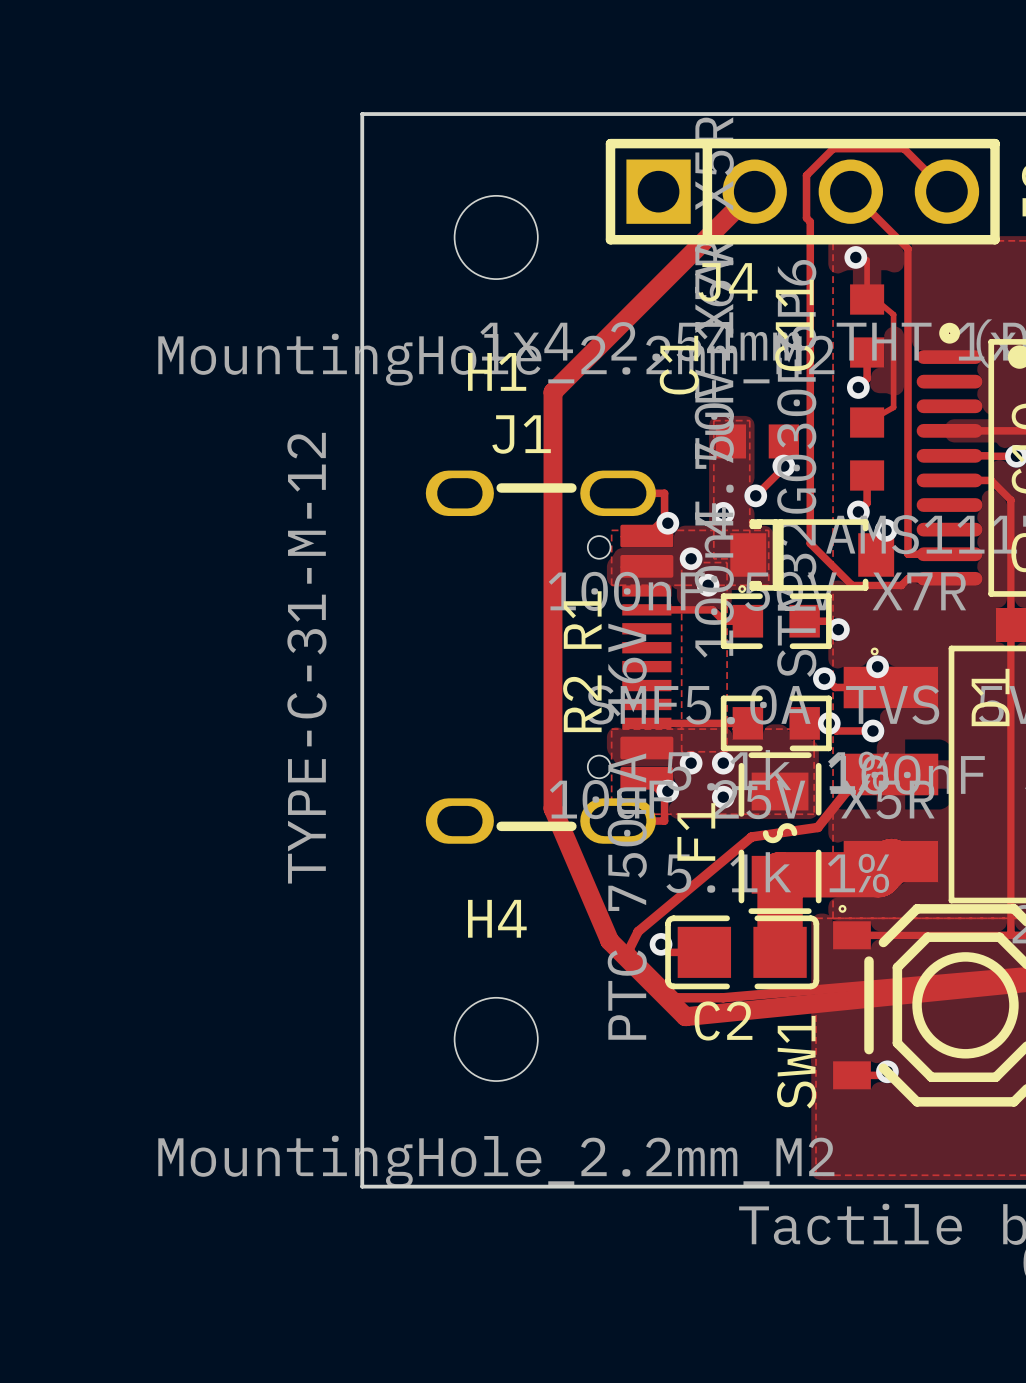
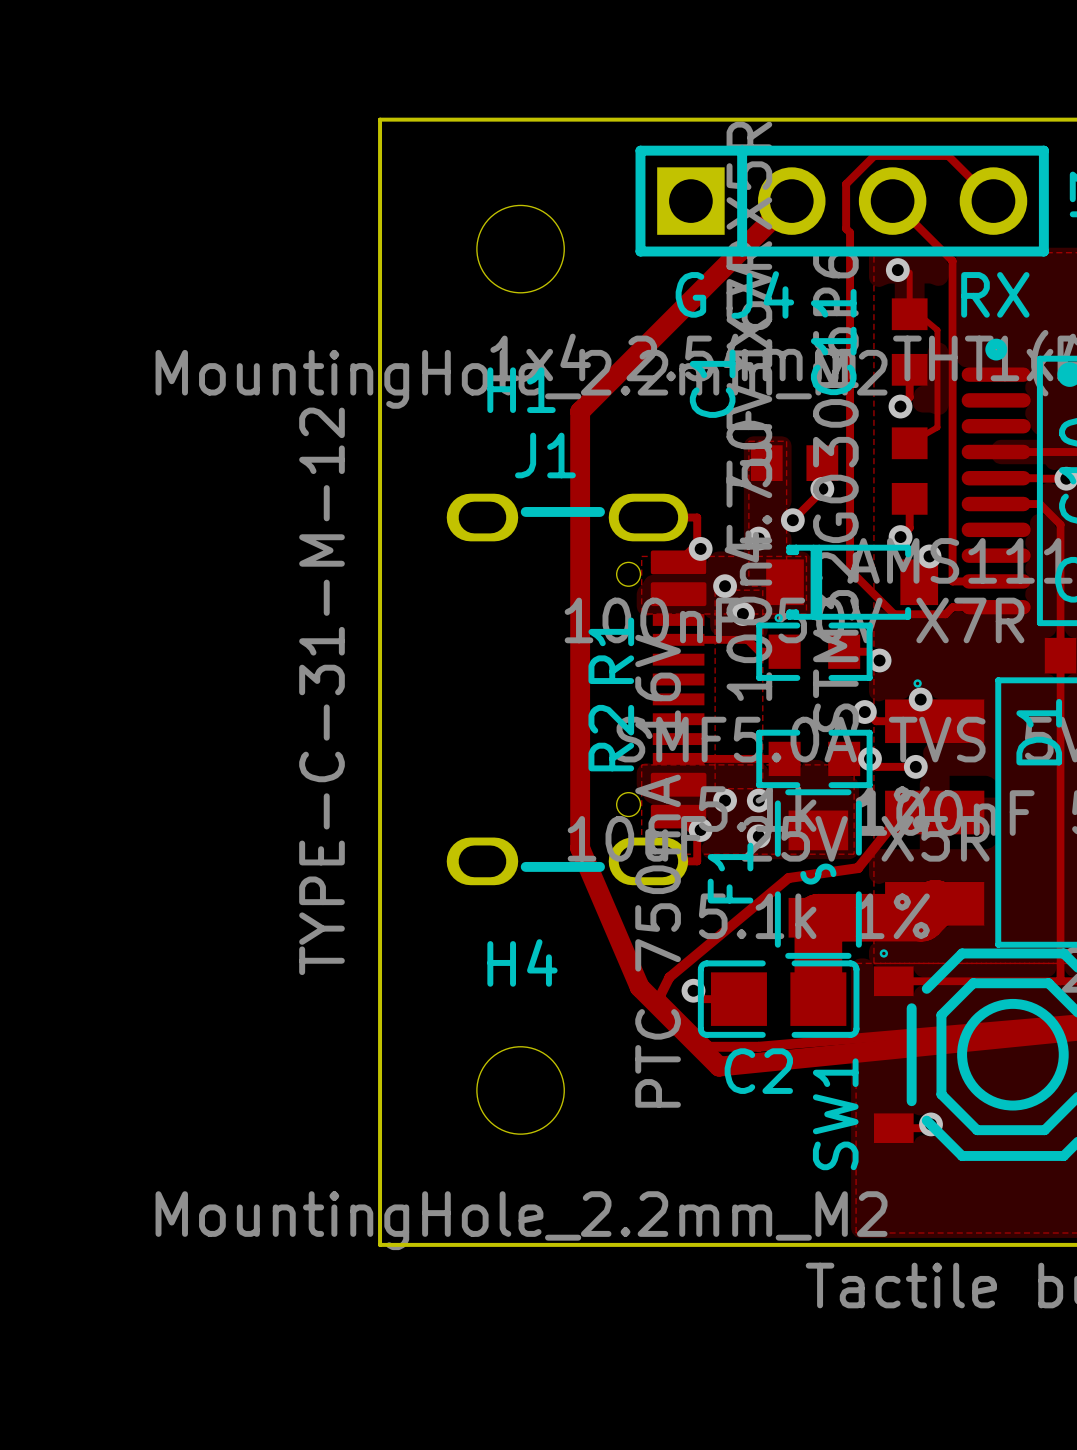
text: none -> G (690, 294)
text: none -> RX (995, 294)

